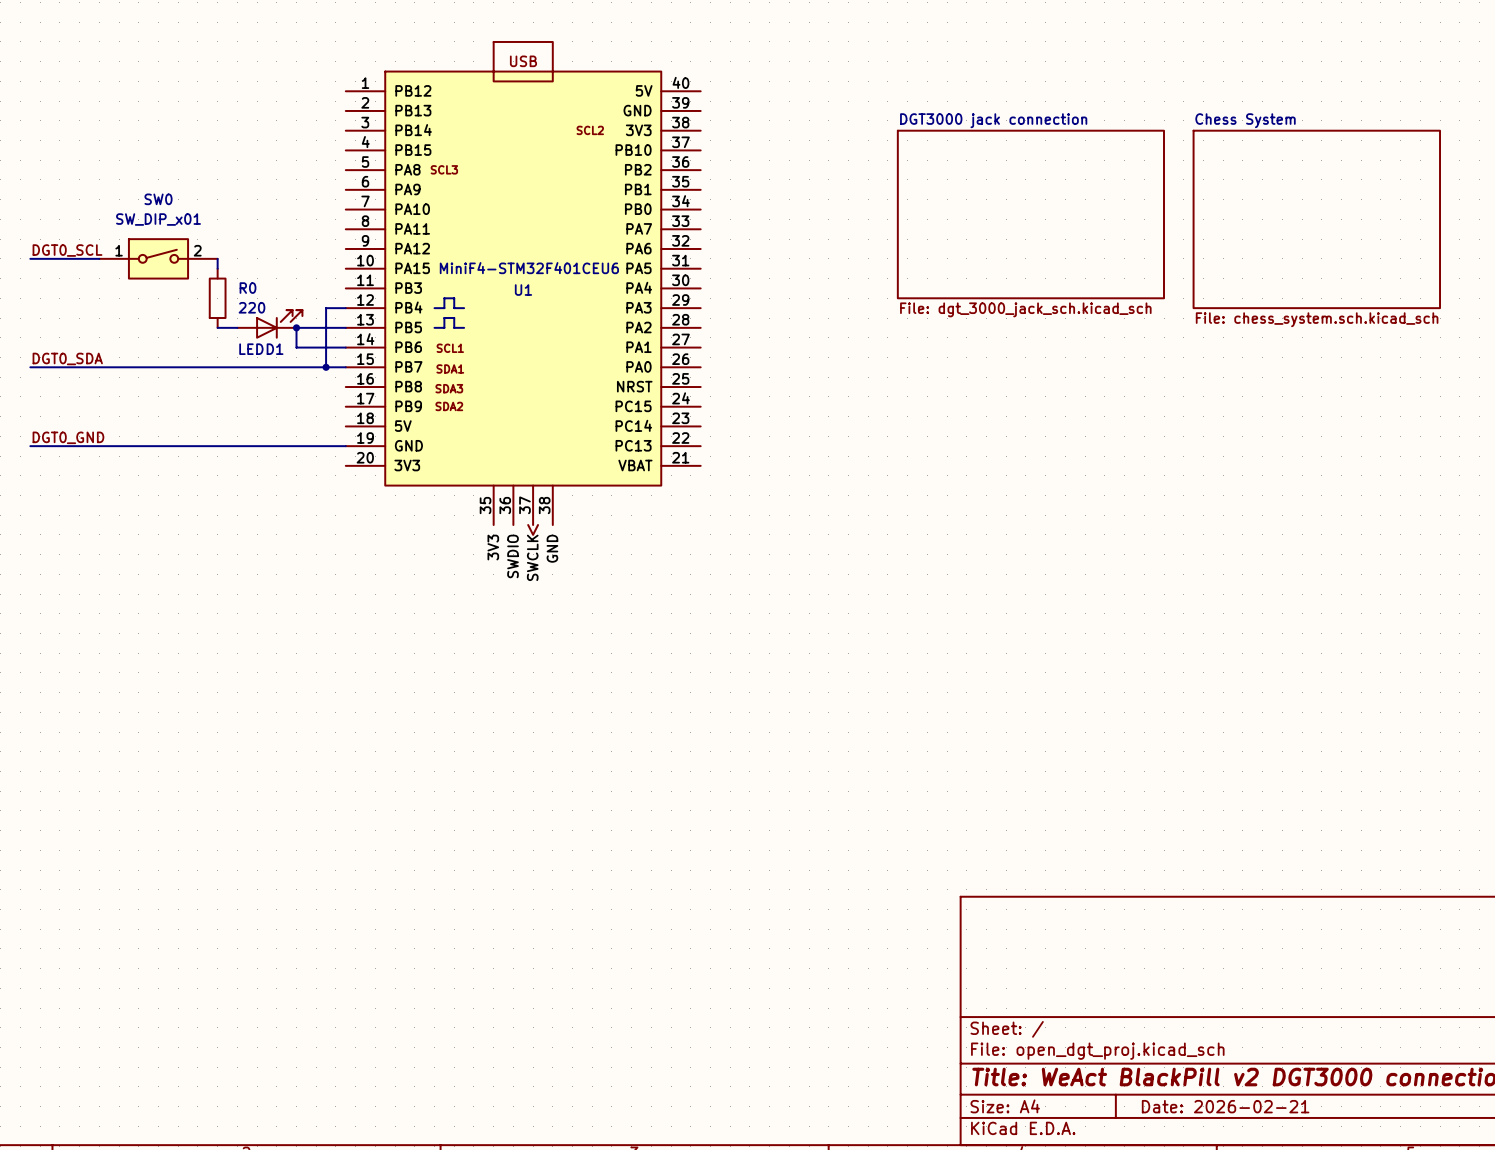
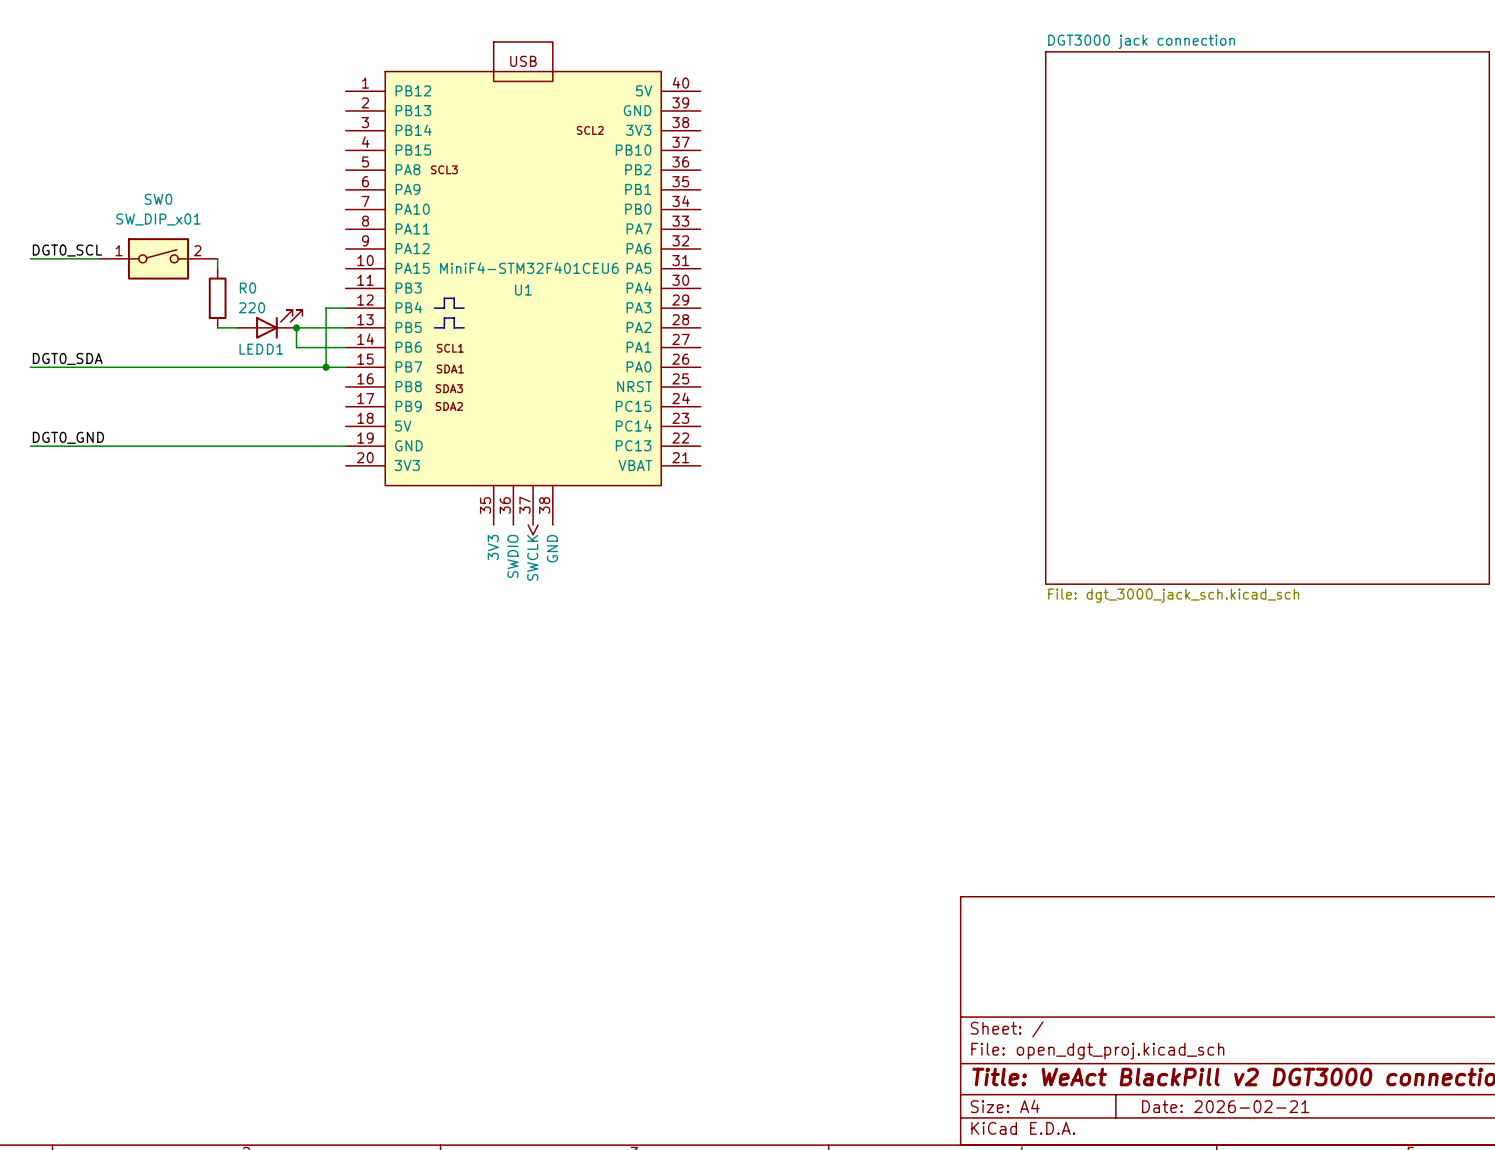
sheet DGT3000 jack connection name position: DGT3000 jack connection (993, 120) -> DGT3000 jack connection (1141, 41)
sheet DGT3000 jack connection shape: [897, 130, 1165, 299] -> [1045, 51, 1490, 585]
sheet Chess System: File: chess_system.sch.kicad_sch (1316, 219) -> none
sheet DGT3000 jack connection value position: File: dgt_3000_jack_sch.kicad_sch (1025, 309) -> File: dgt_3000_jack_sch.kicad_sch (1173, 595)

